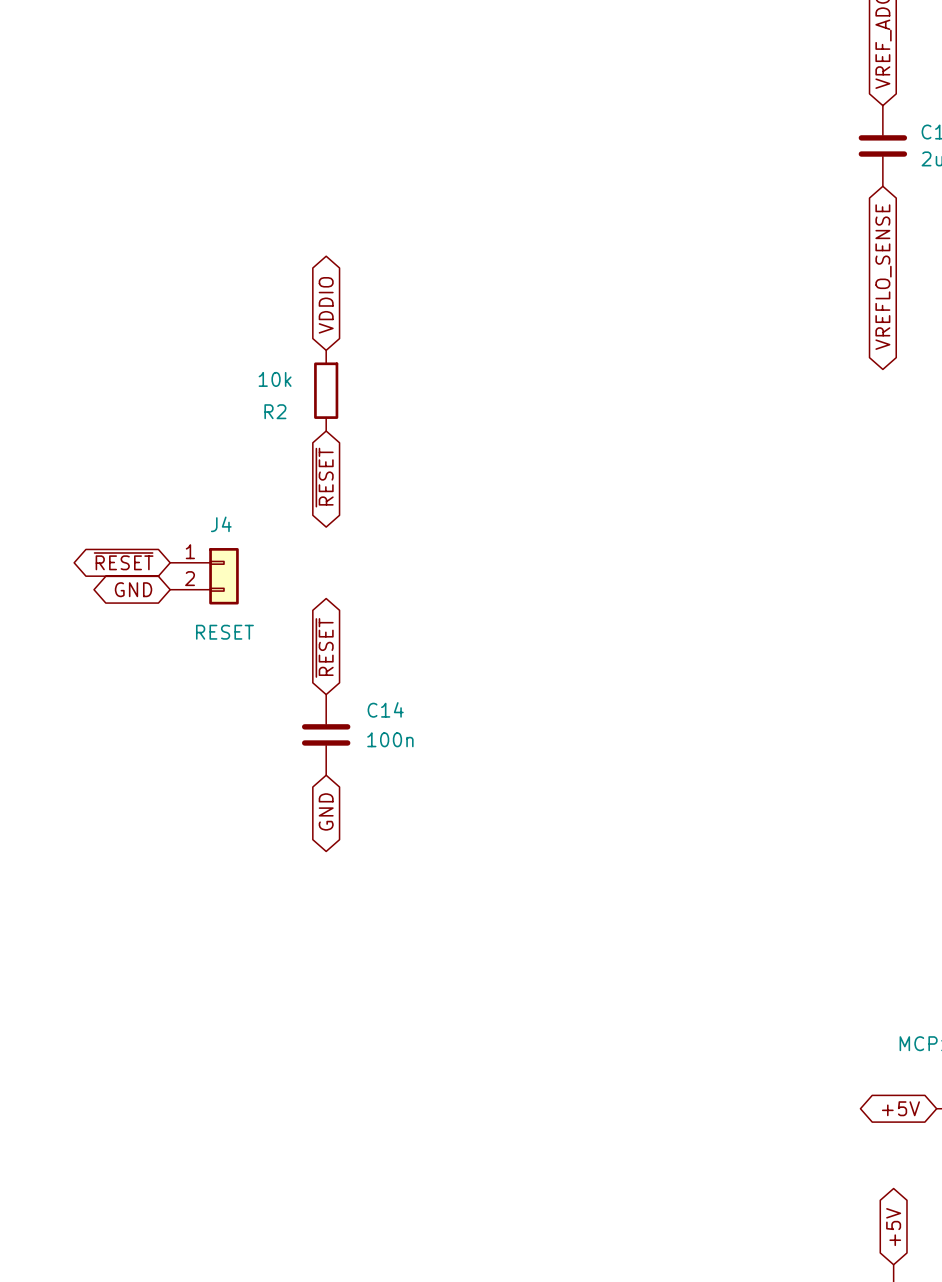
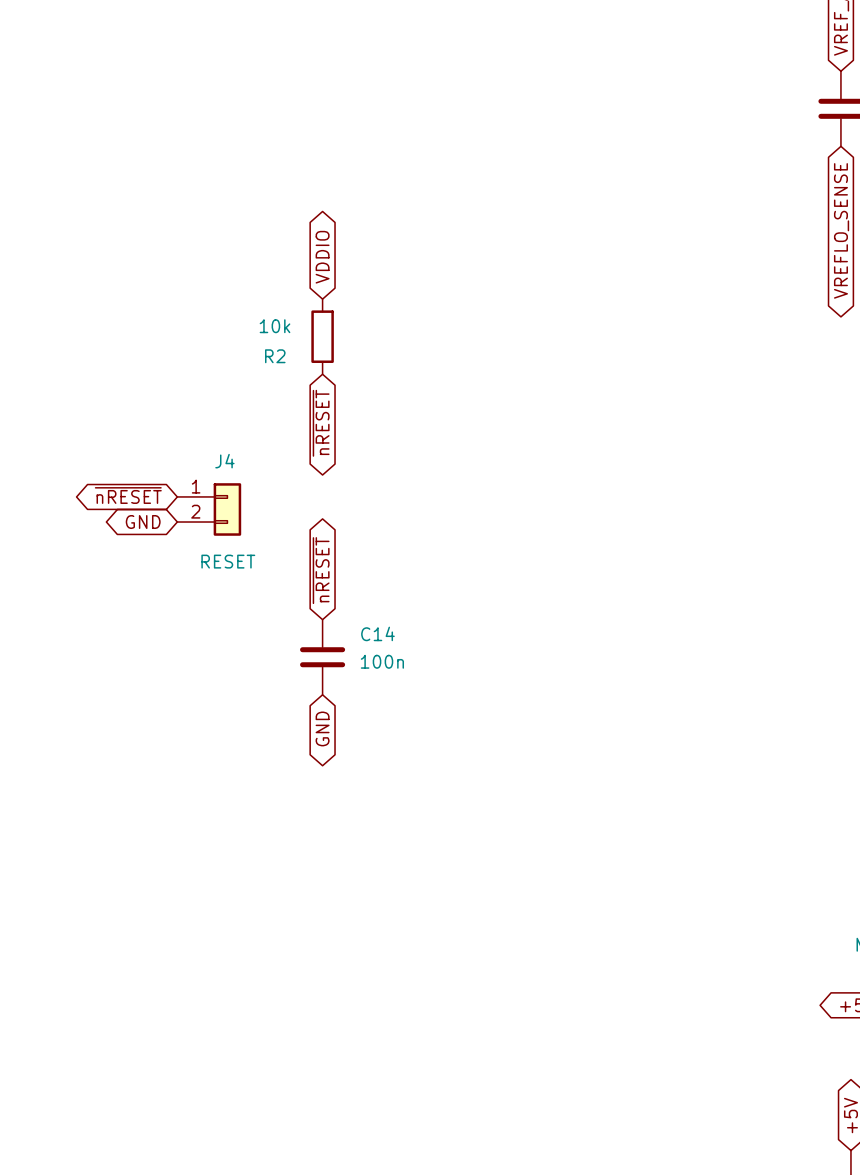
global label: ~{RESET} (324, 477) -> ~{nRESET} (321, 423)
global label: ~{RESET} (123, 561) -> ~{nRESET} (128, 495)
global label: ~{RESET} (324, 647) -> ~{nRESET} (321, 570)

